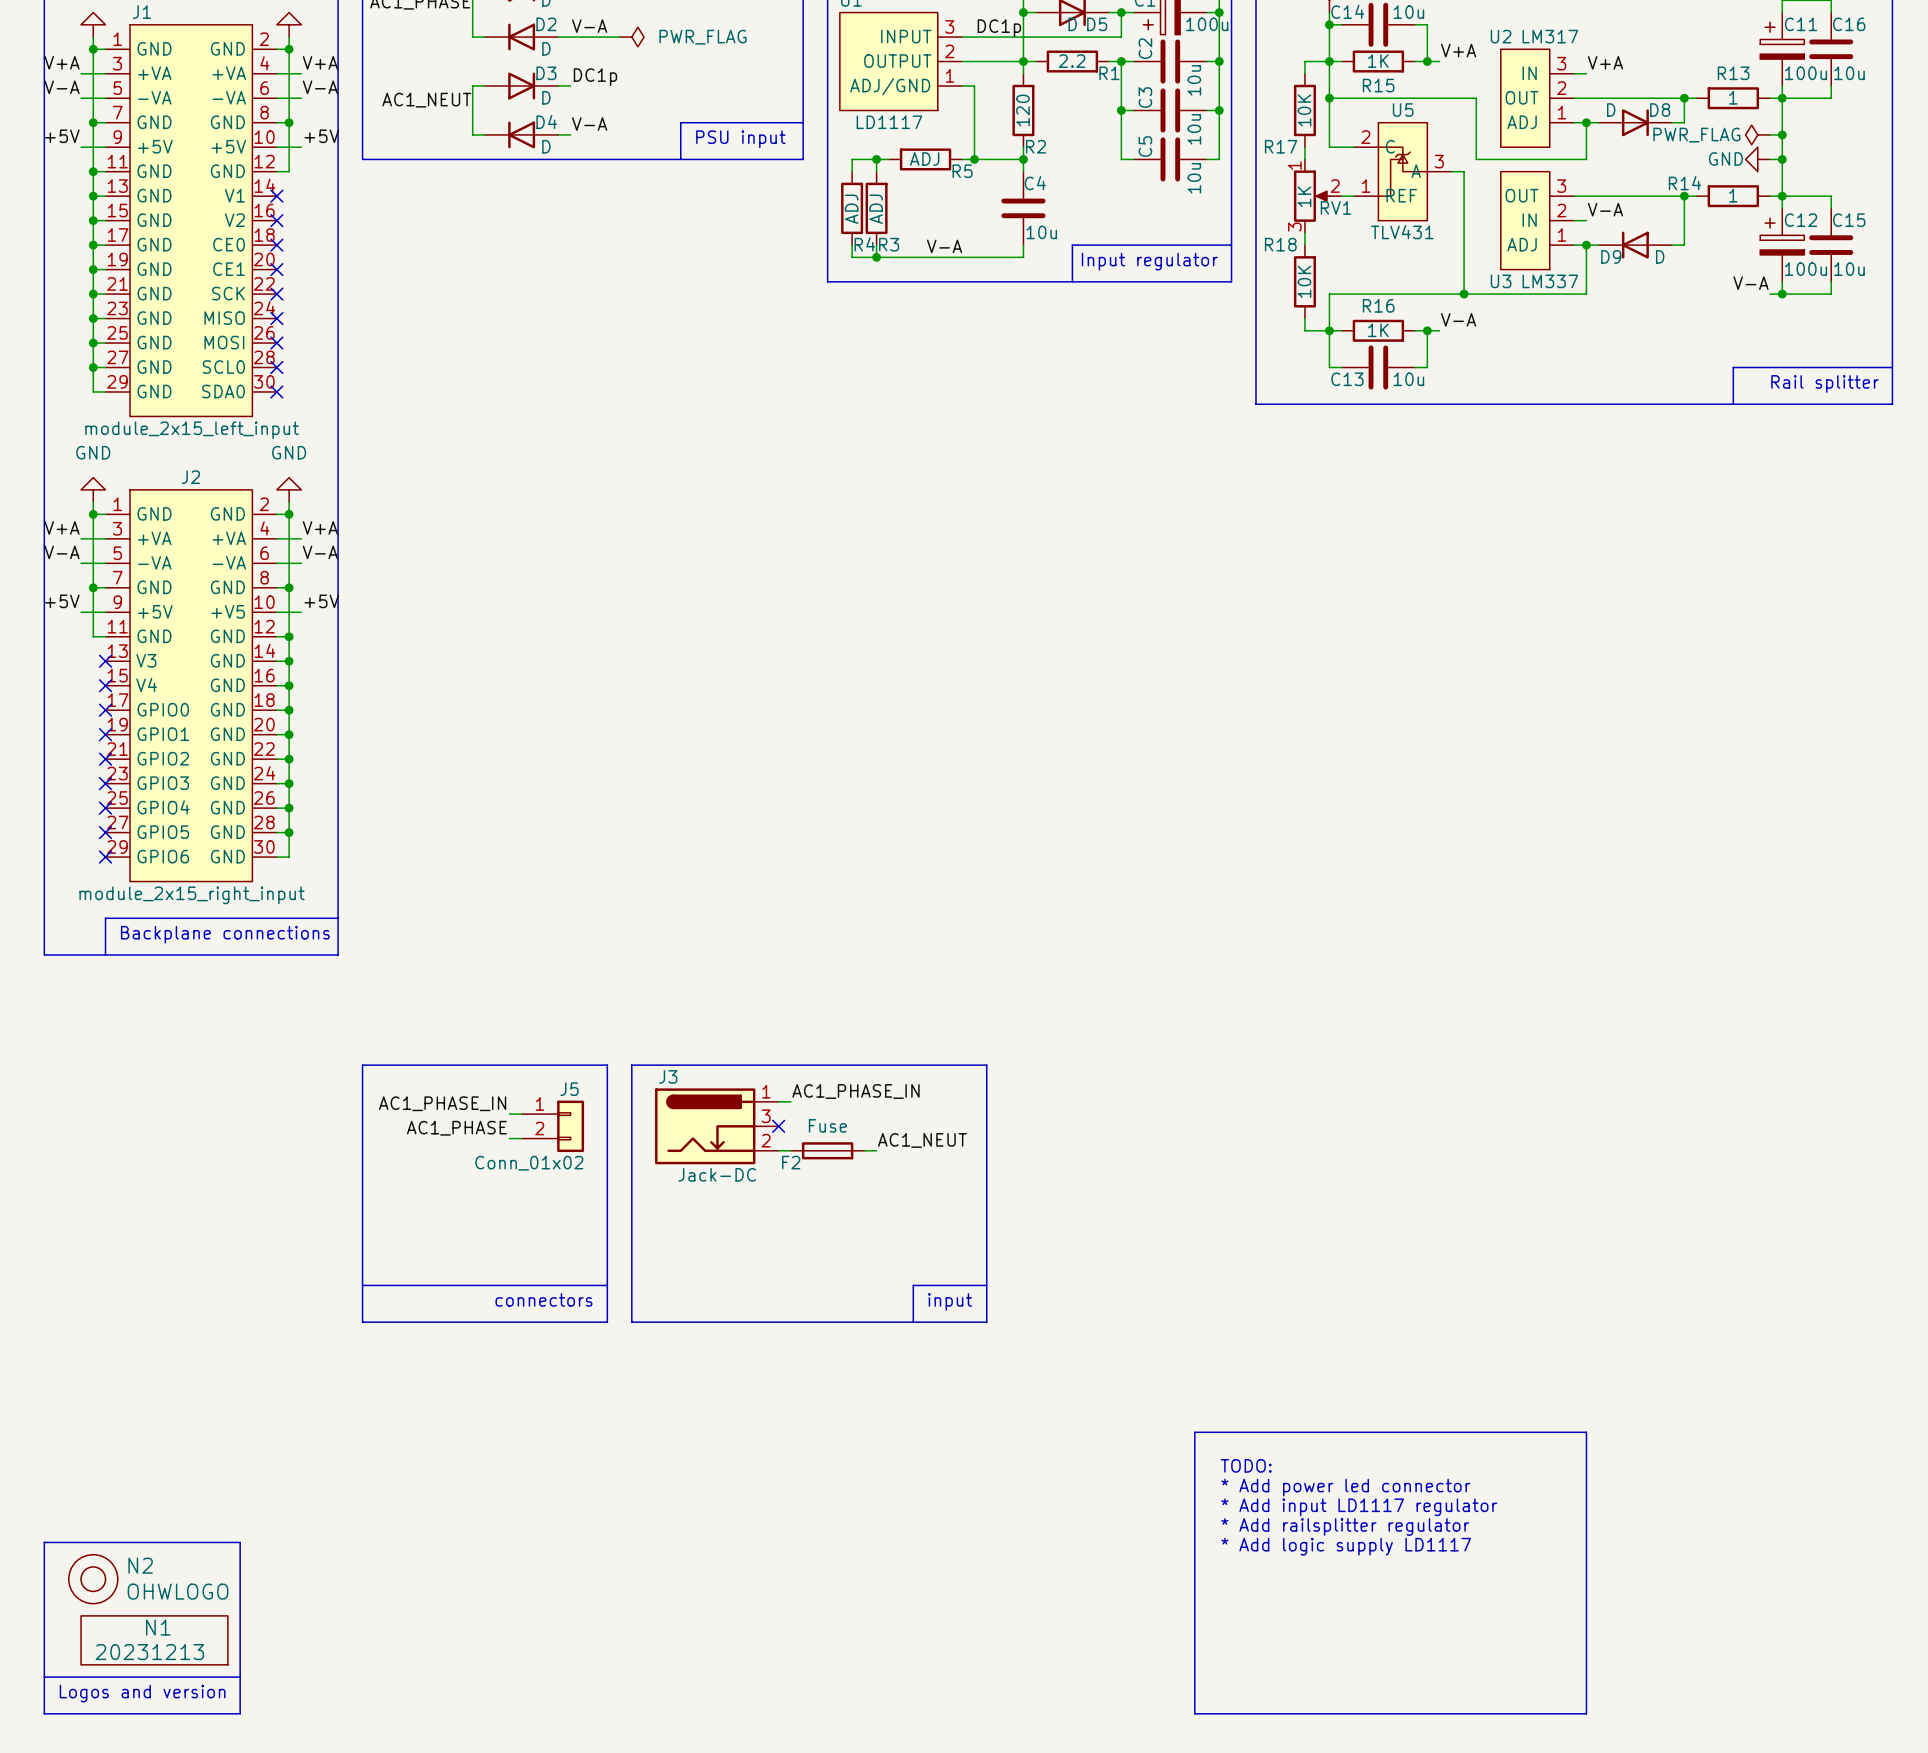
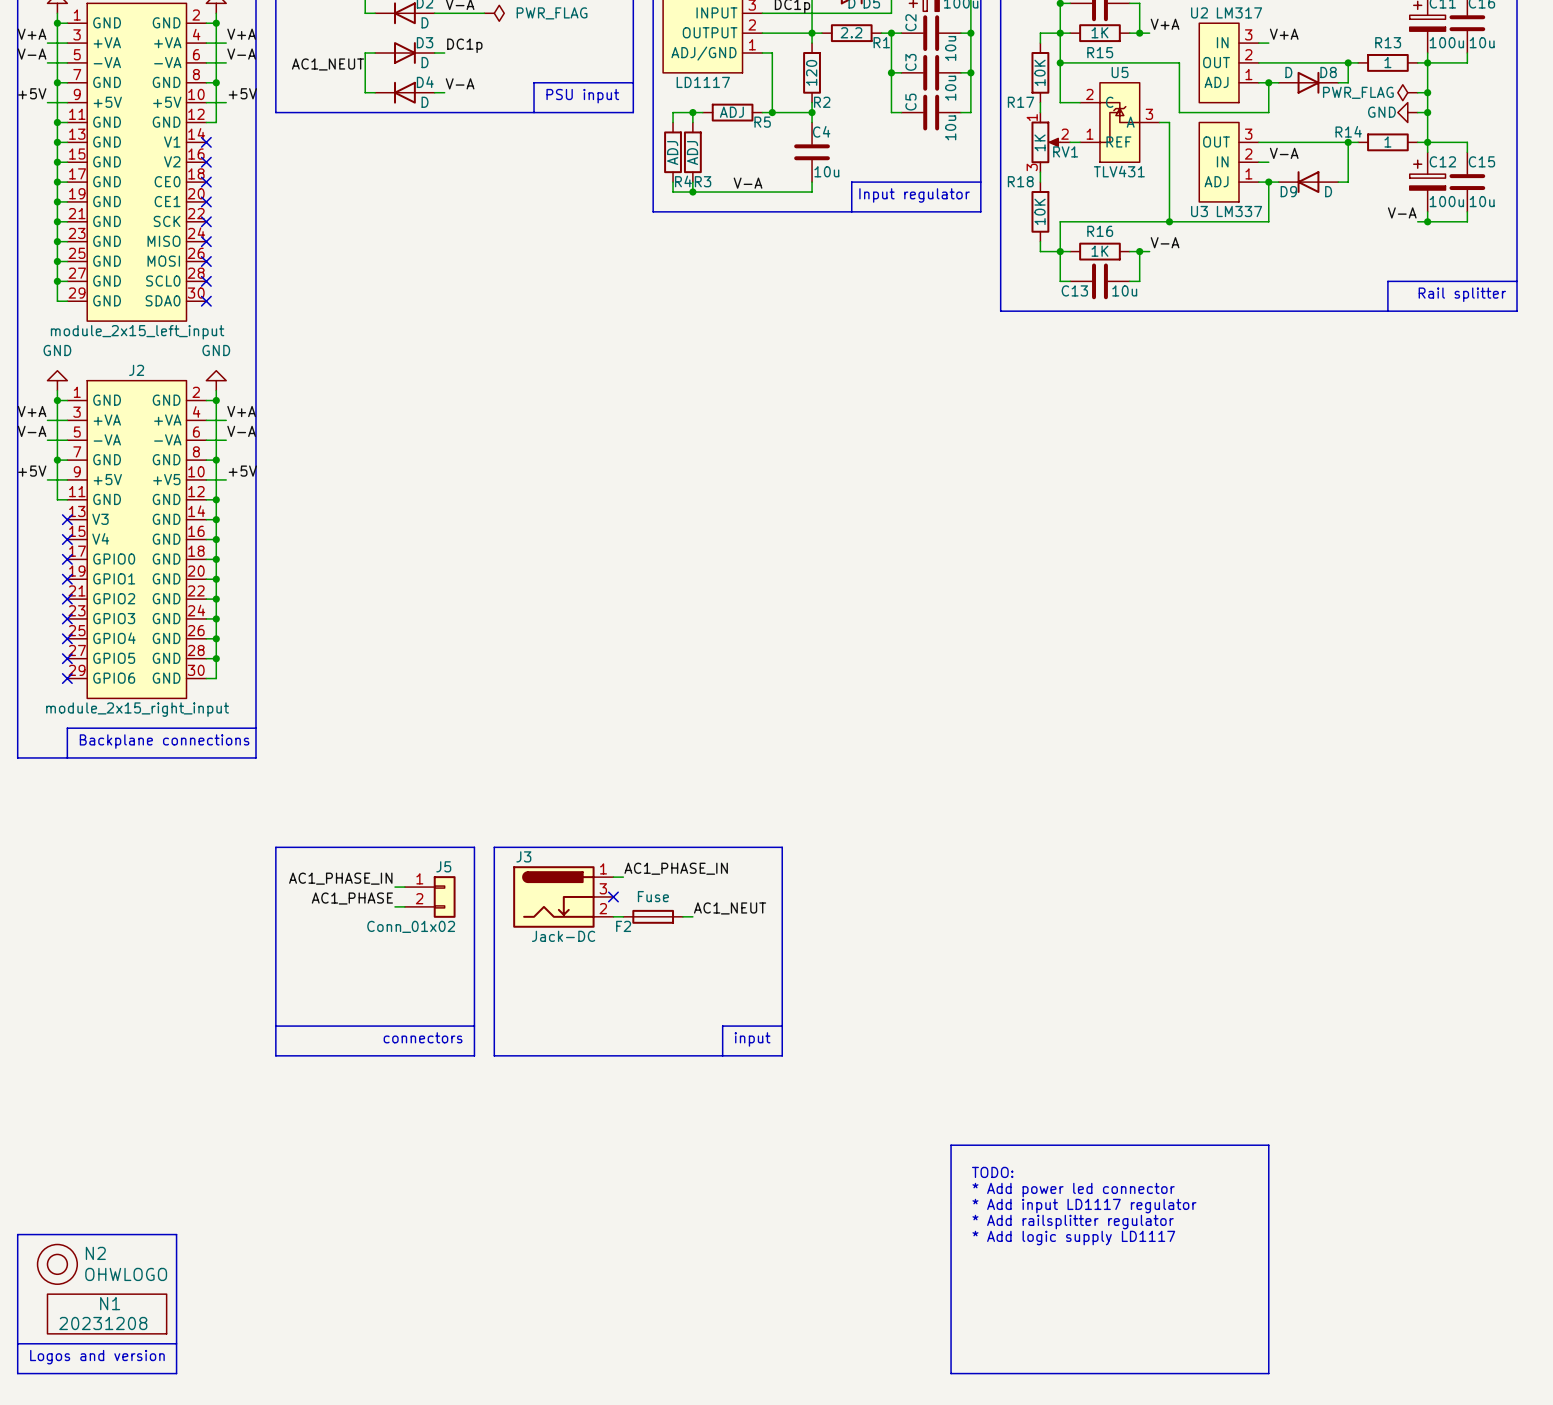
N1 value: 20231213 (149, 1652) -> 20231208 (103, 1323)

